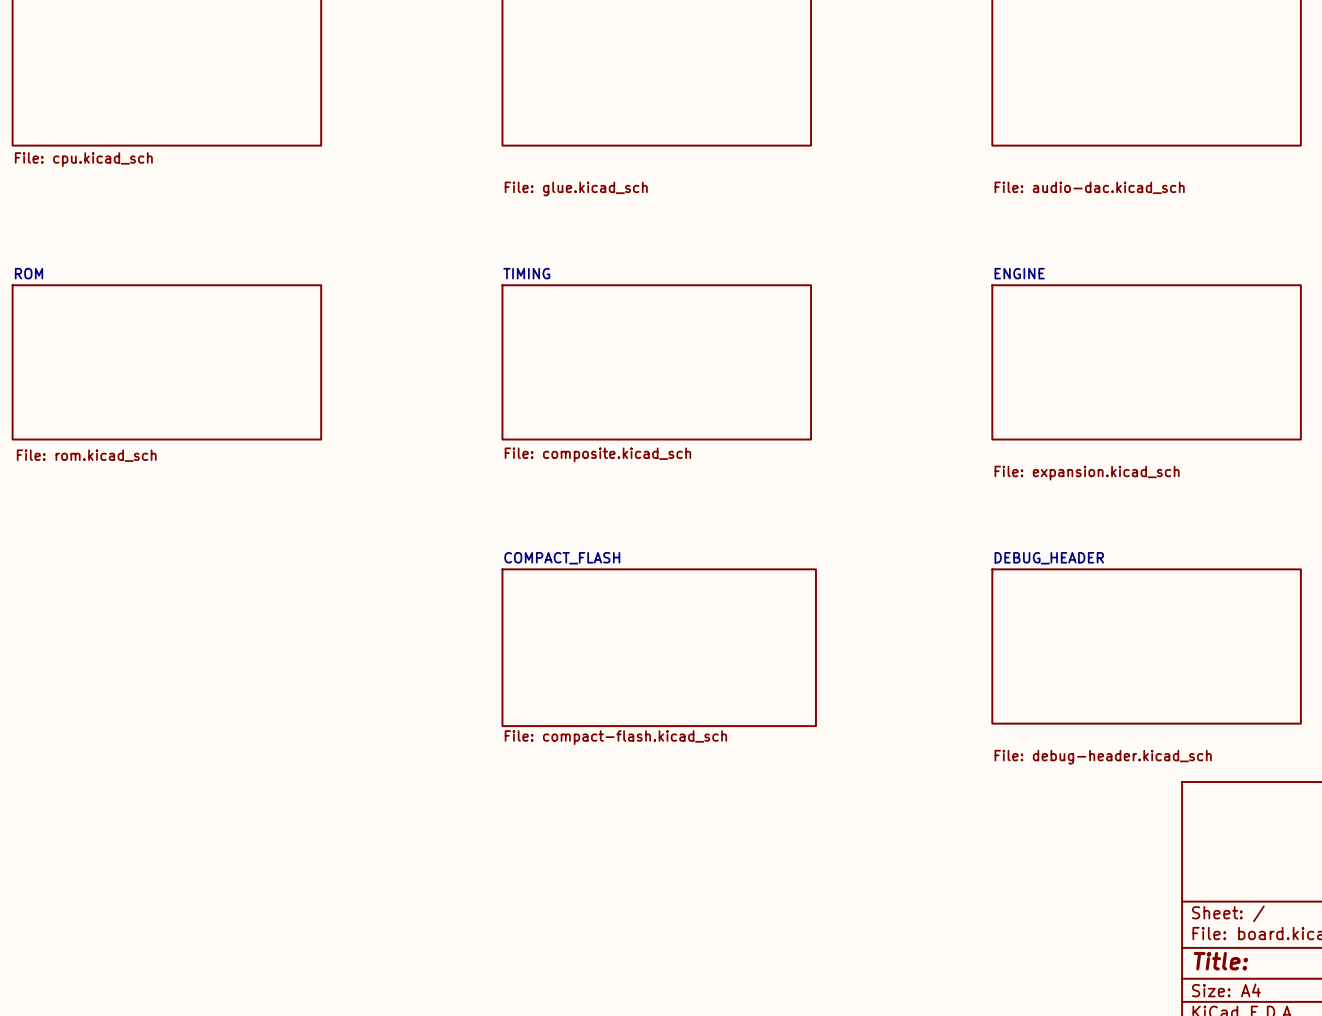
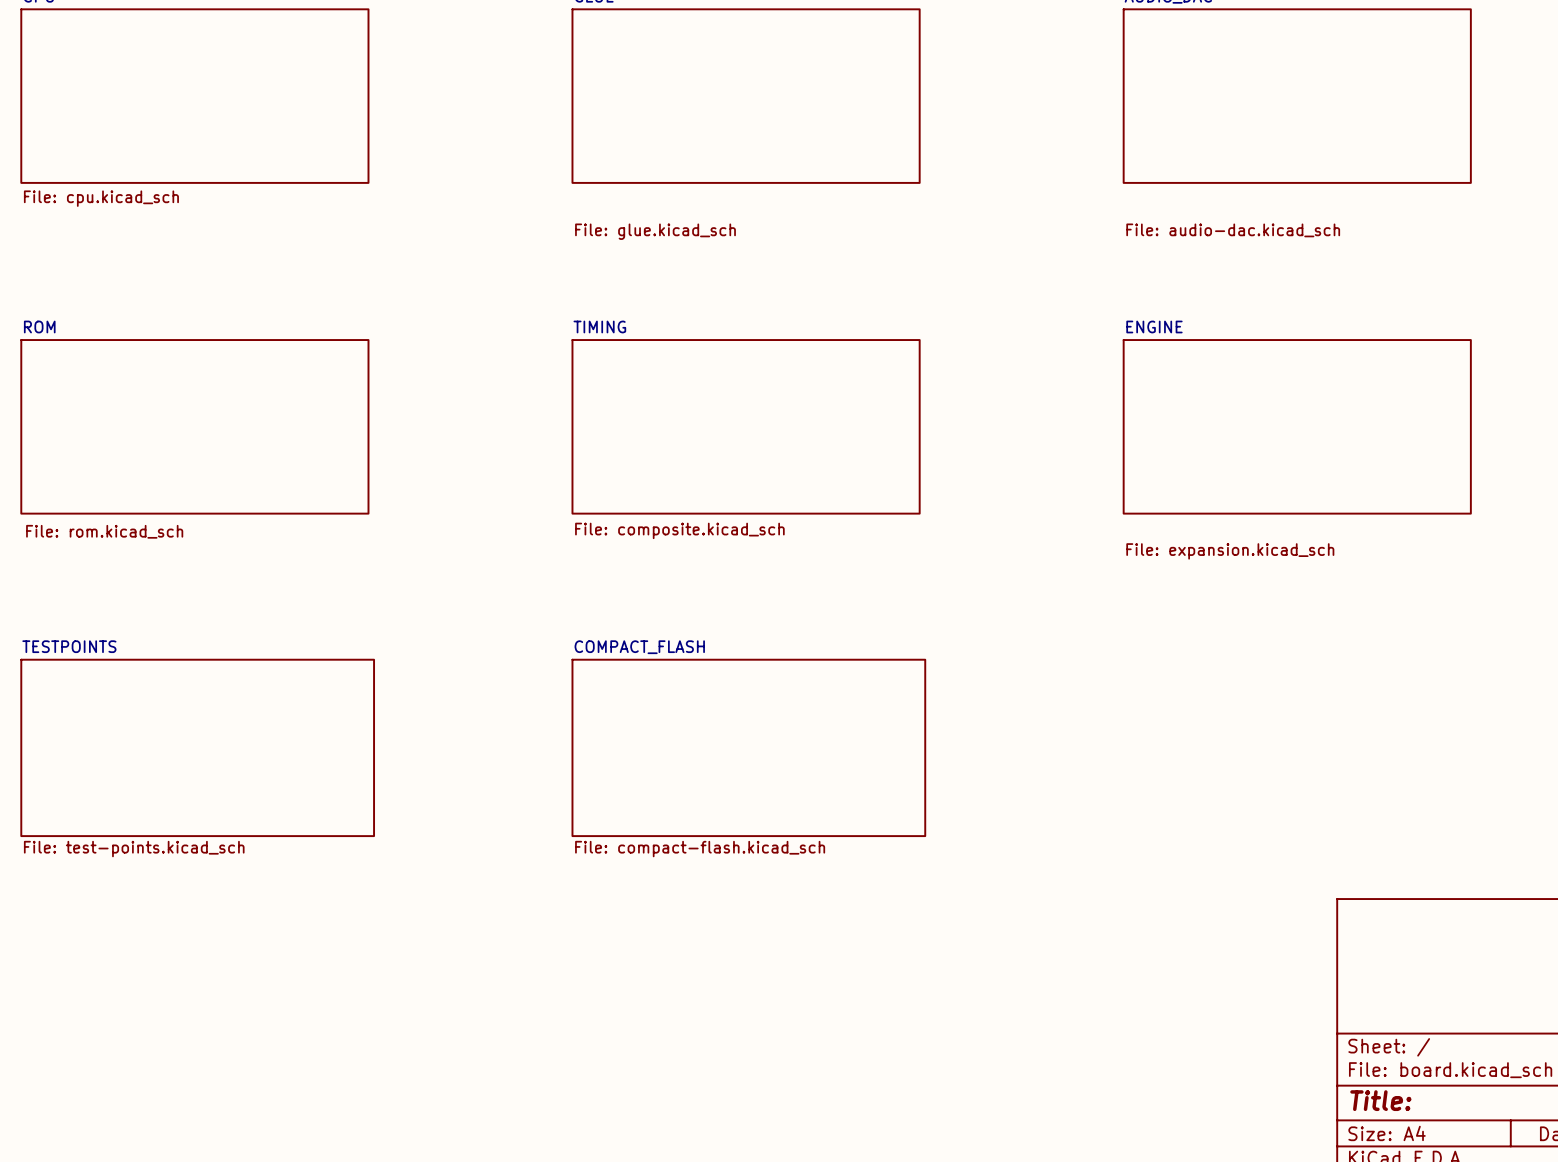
sheet DEBUG_HEADER: File: debug-header.kicad_sch (1146, 646) -> none
sheet TESTPOINTS: none -> File: test-points.kicad_sch (197, 747)

